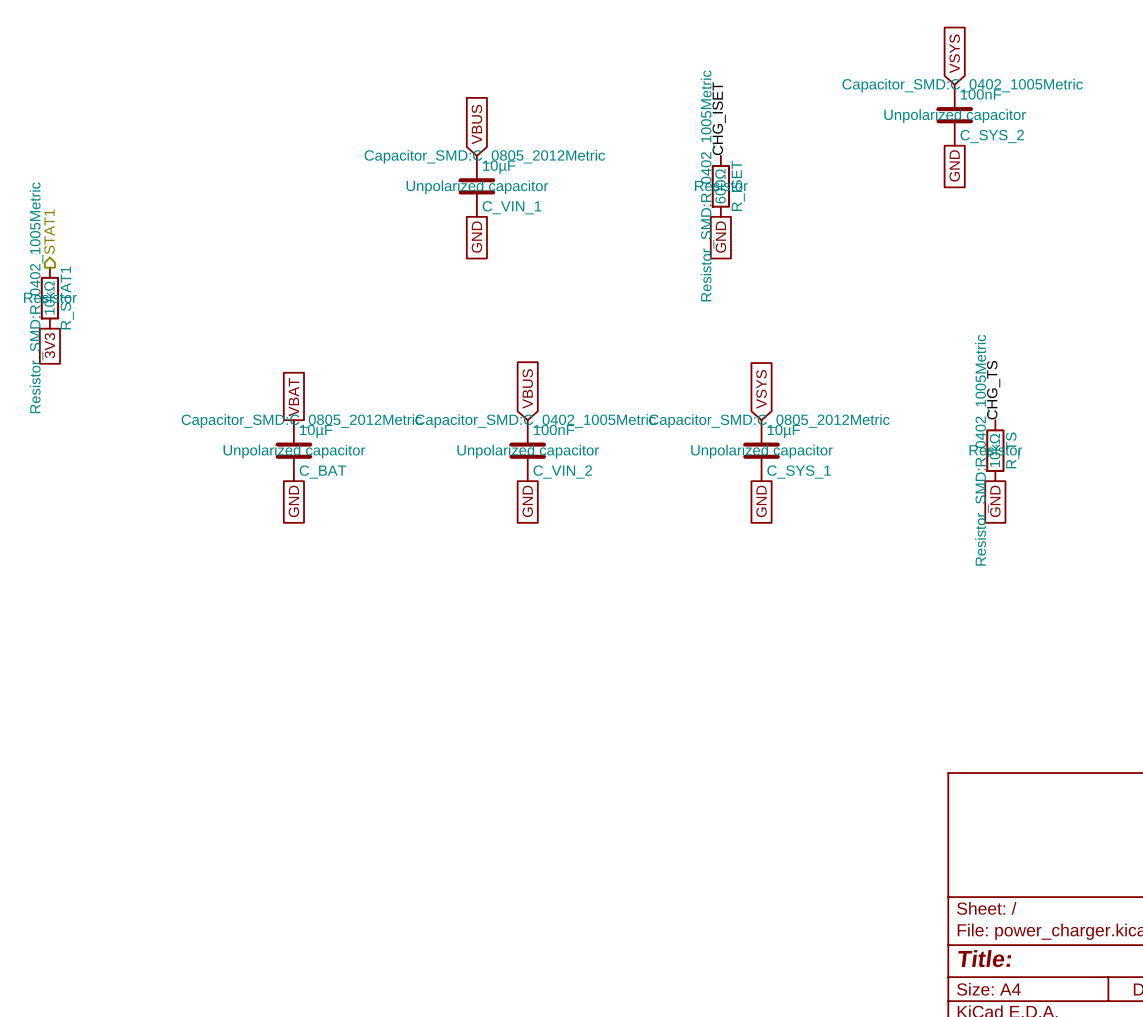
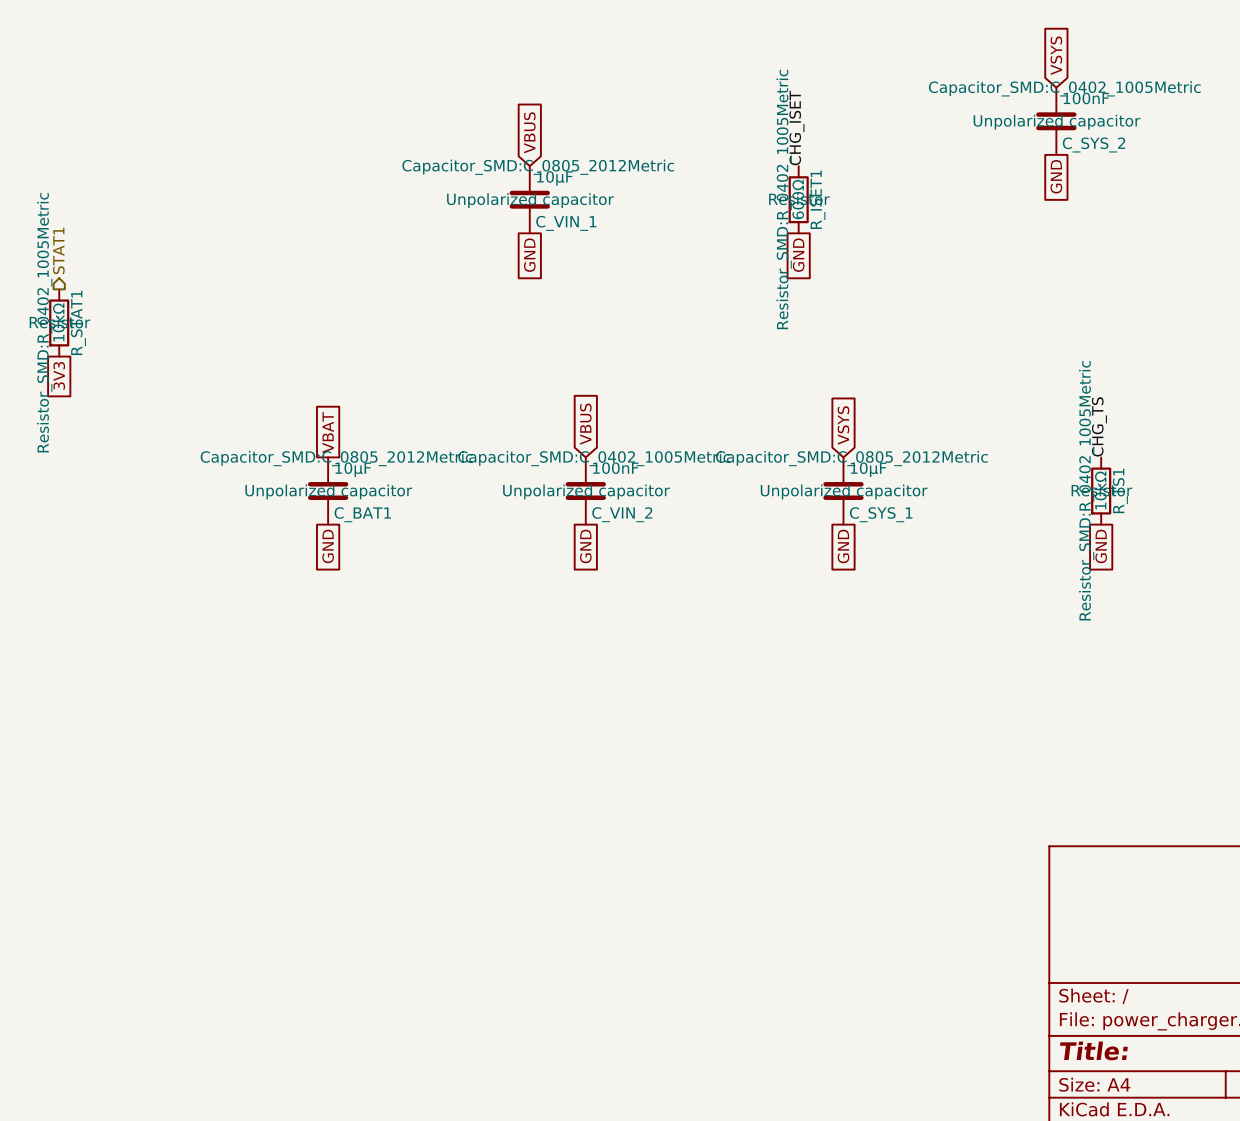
R_ISET name: R_ISET (738, 185) -> R_ISET1 (817, 199)
R_TS name: R_TS (1012, 450) -> R_TS1 (1120, 490)
C_BAT name: C_BAT (323, 472) -> C_BAT1 (362, 514)

